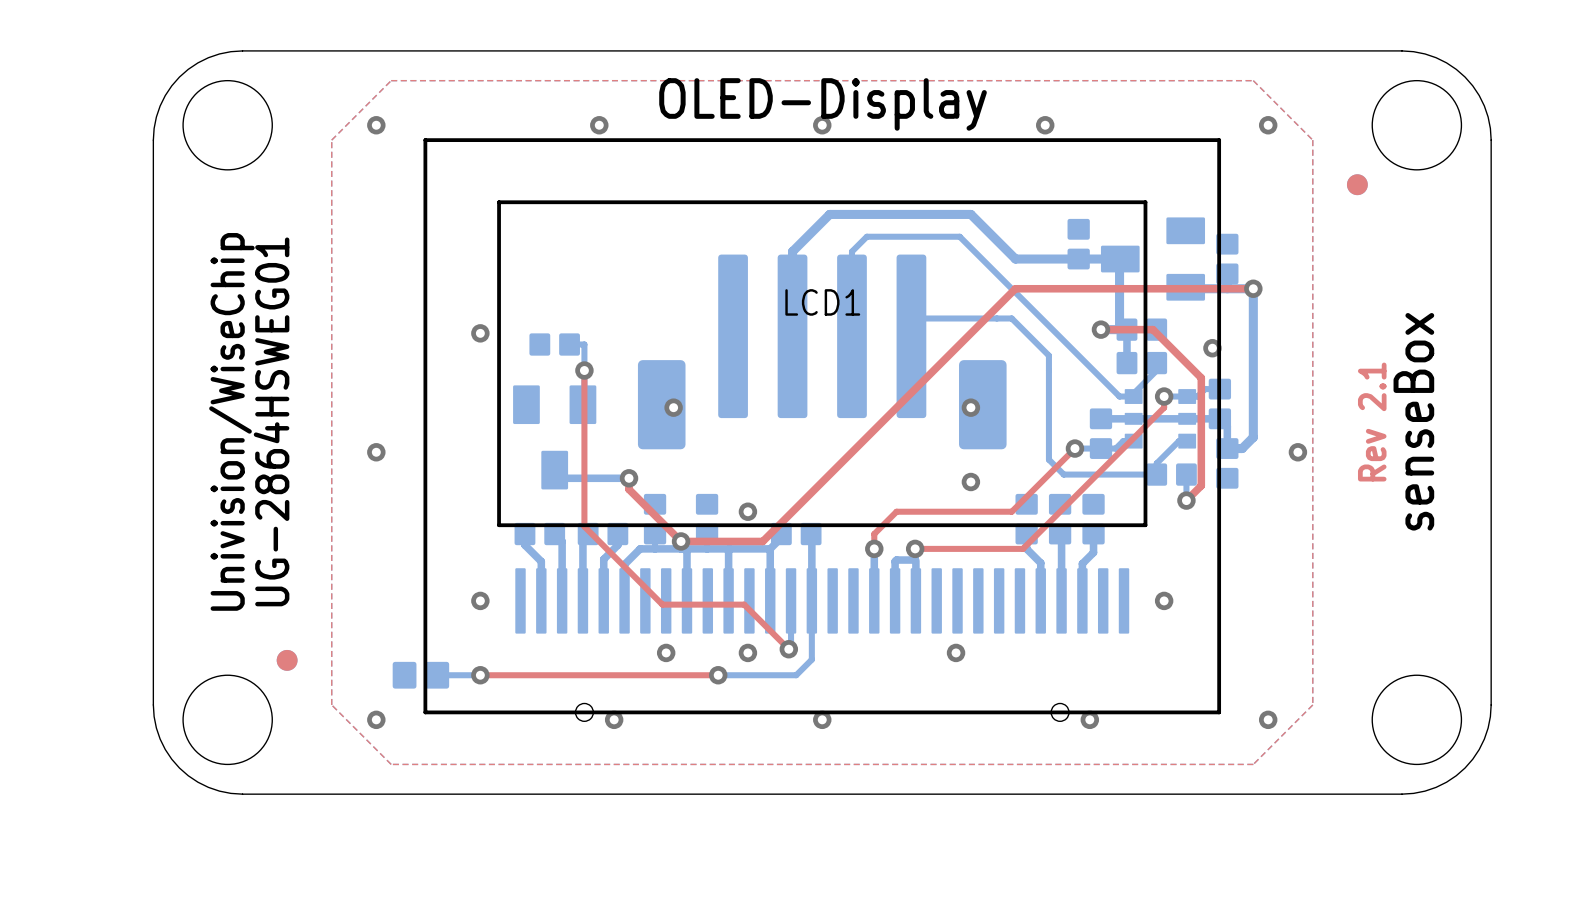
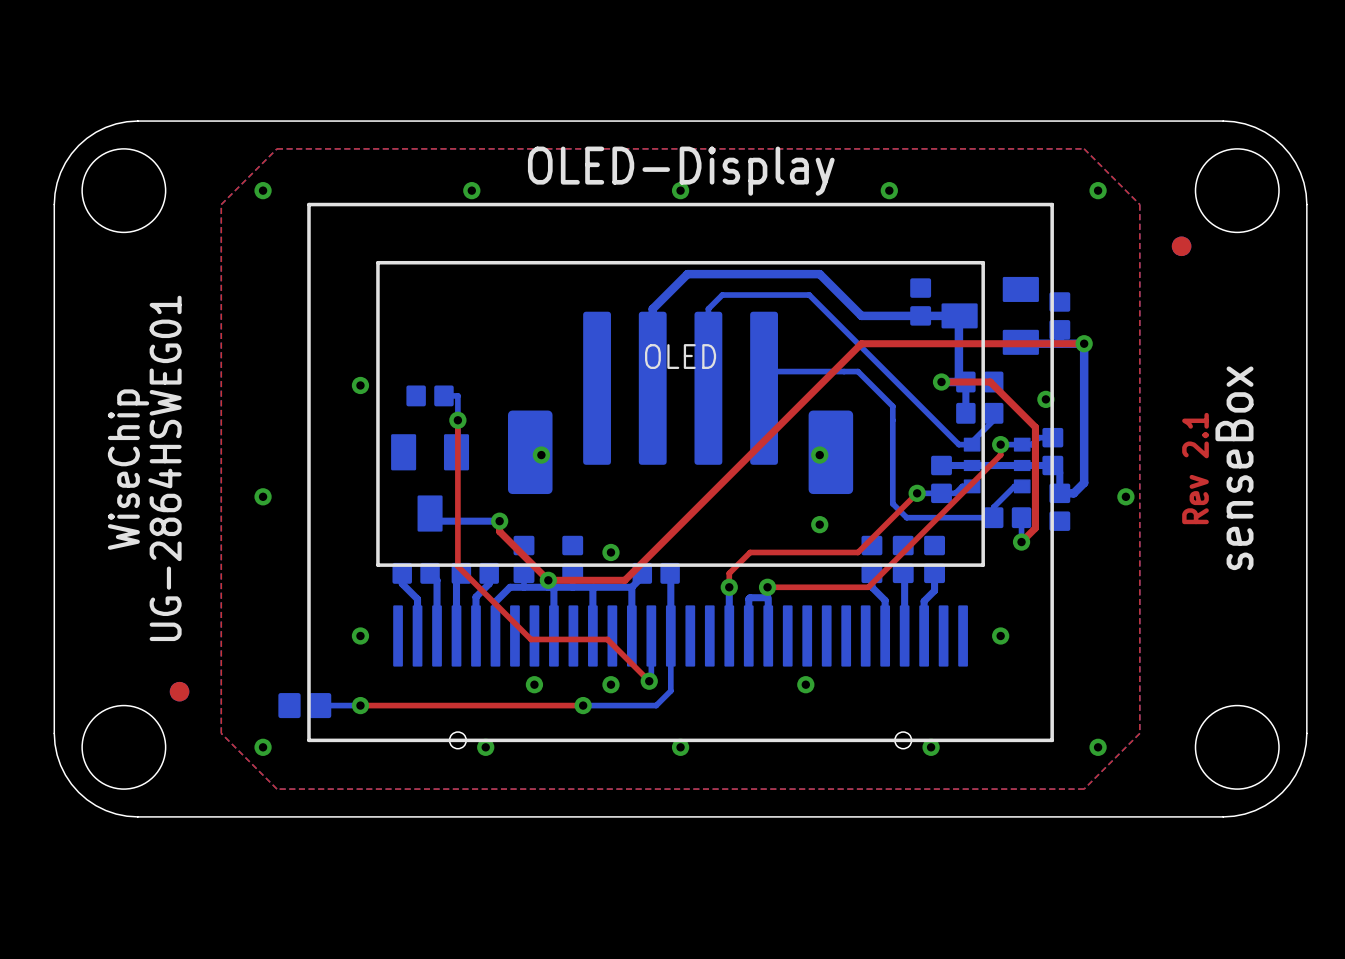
LCD1 name: LCD1 (822, 302) -> OLED (680, 356)
text: Univision/WiseChip (231, 421) -> WiseChip (128, 469)

